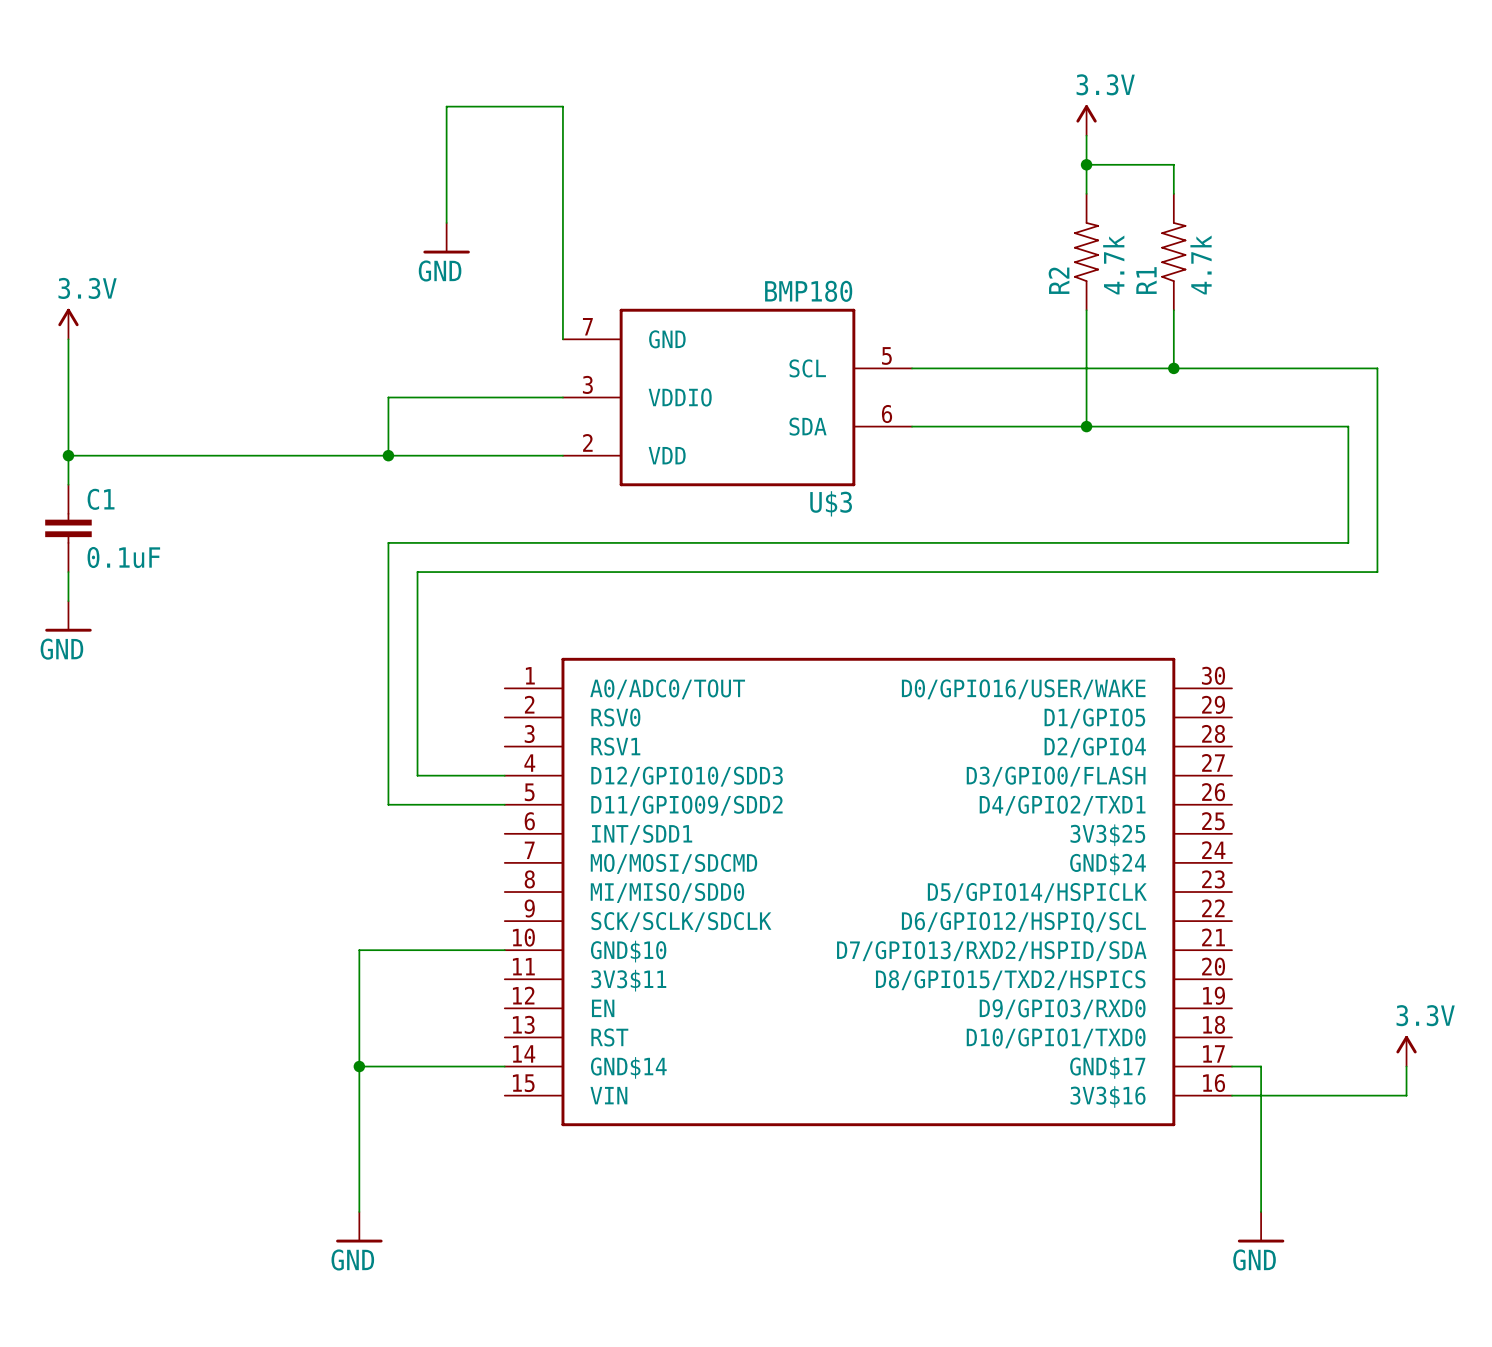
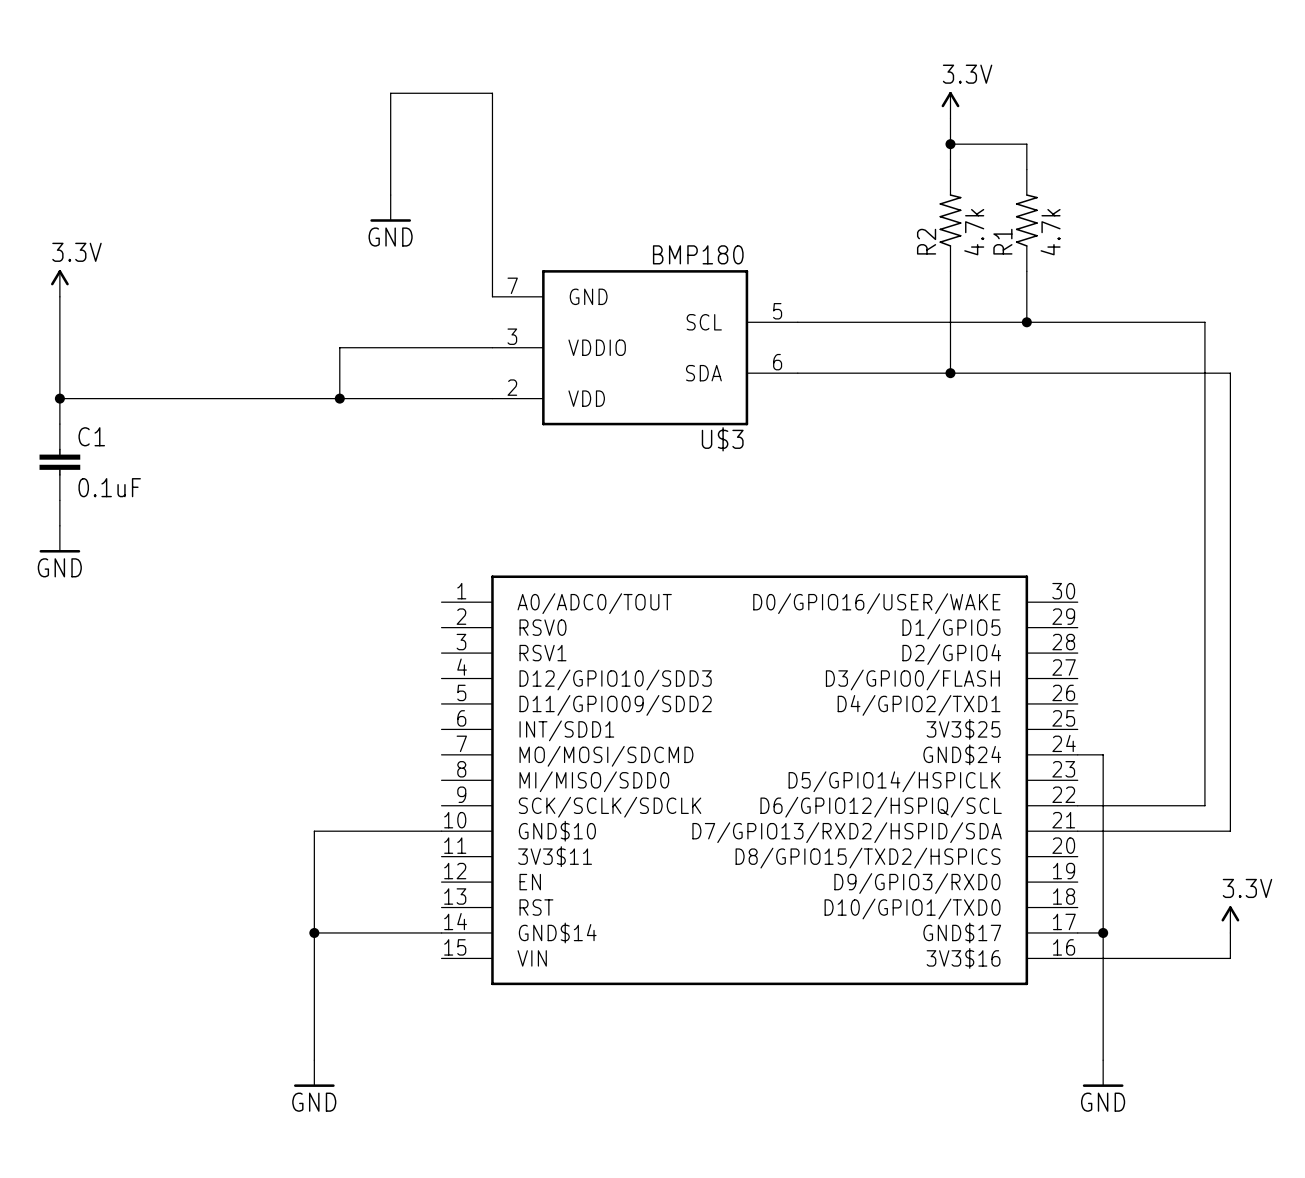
wire: (1348, 426) (1348, 542) (388, 542) (388, 804) (504, 804) -> (1179, 373) (1230, 373) (1230, 831) (1077, 831)
wire: (1377, 572) (417, 572) (417, 775) (504, 775) -> (1204, 500) (1204, 805) (1077, 805)
wire: none -> (1077, 754) (1103, 754) (1103, 932)
junction: none -> (1103, 932)

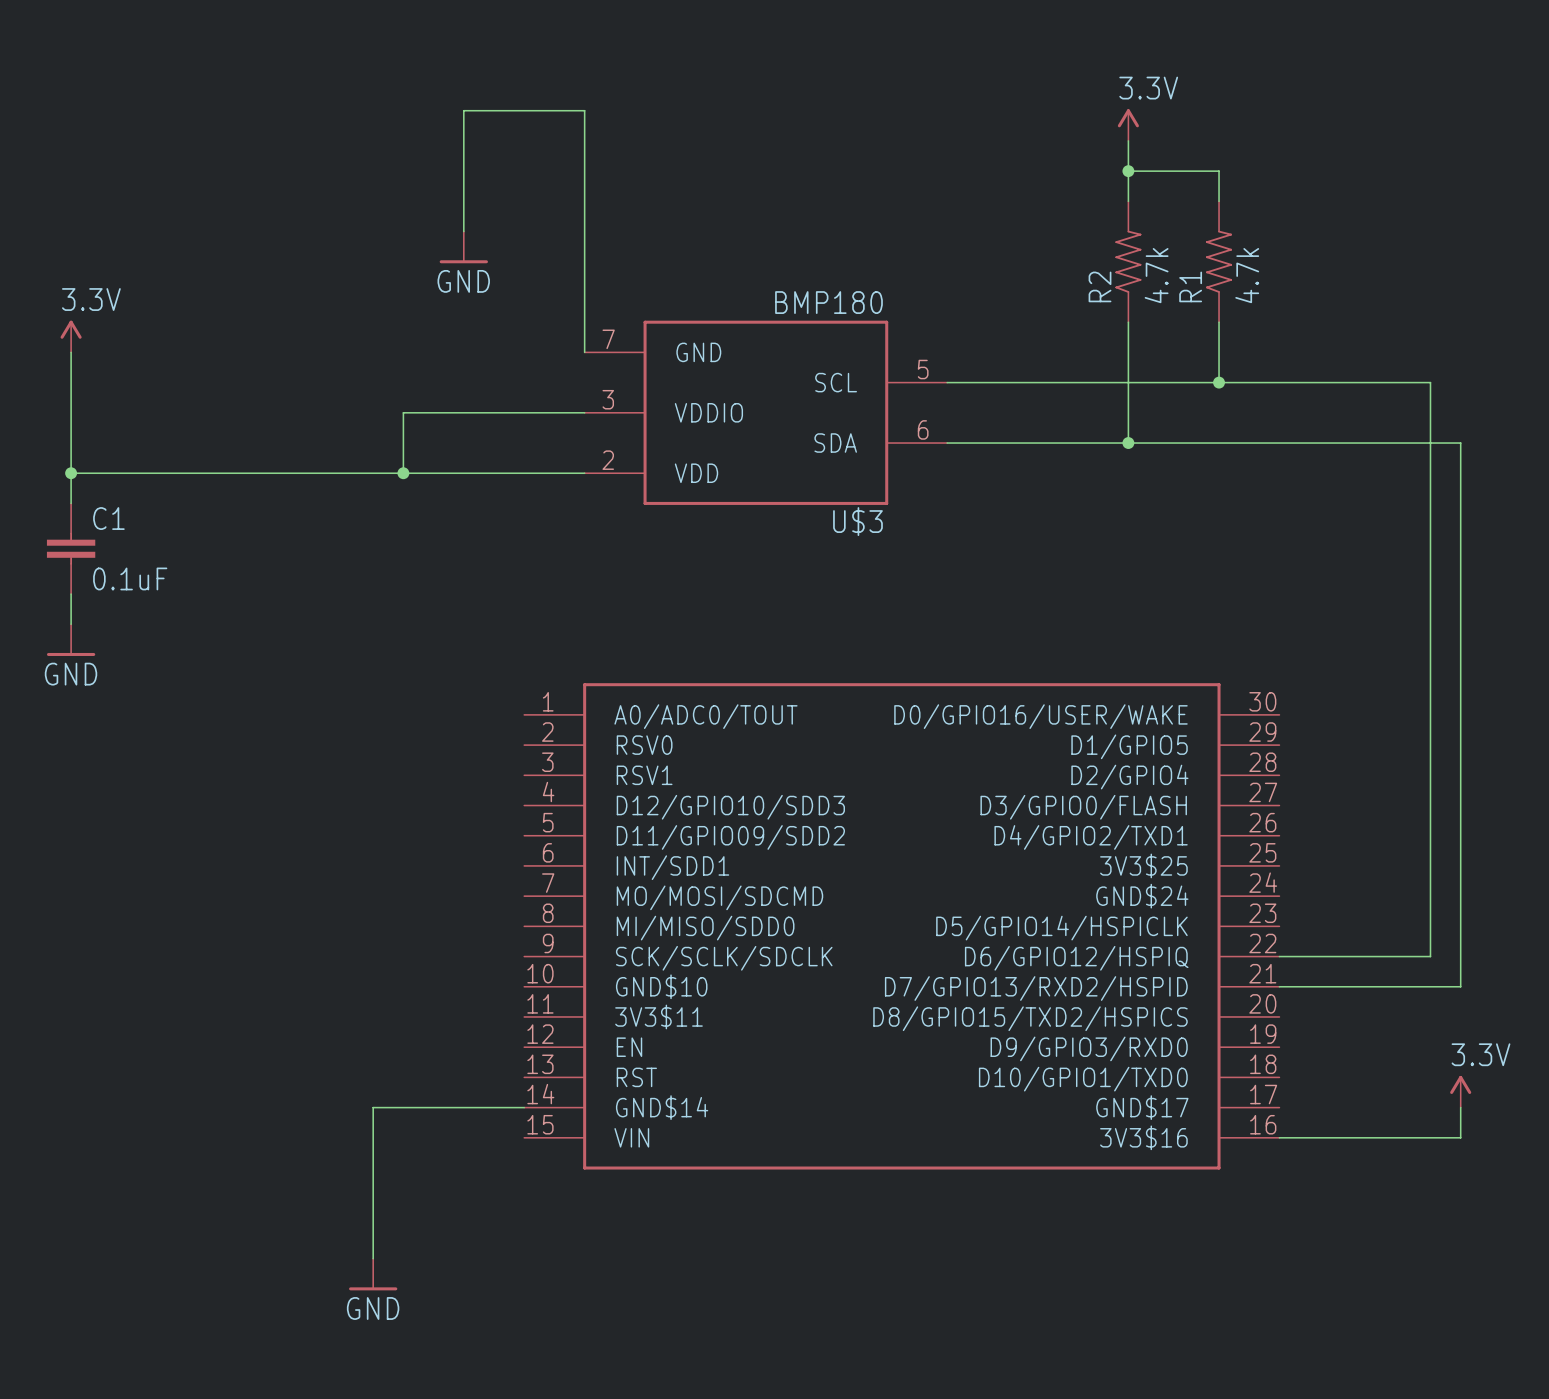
wire: (1077, 754) (1103, 754) (1103, 1060) -> none
part pin name: D6/GPIO12/HSPIQ/SCL (881, 807) -> D6/GPIO12/HSPIQ (1076, 958)
wire: (441, 831) (314, 831) (314, 932) -> none
part pin name: D7/GPIO13/RXD2/HSPID/SDA (847, 832) -> D7/GPIO13/RXD2/HSPID (1036, 988)
junction: (314, 932) -> none
wire: (1077, 932) (1103, 932) -> none
junction: (1103, 932) -> none
power symbol: GND (1103, 1073) -> none

